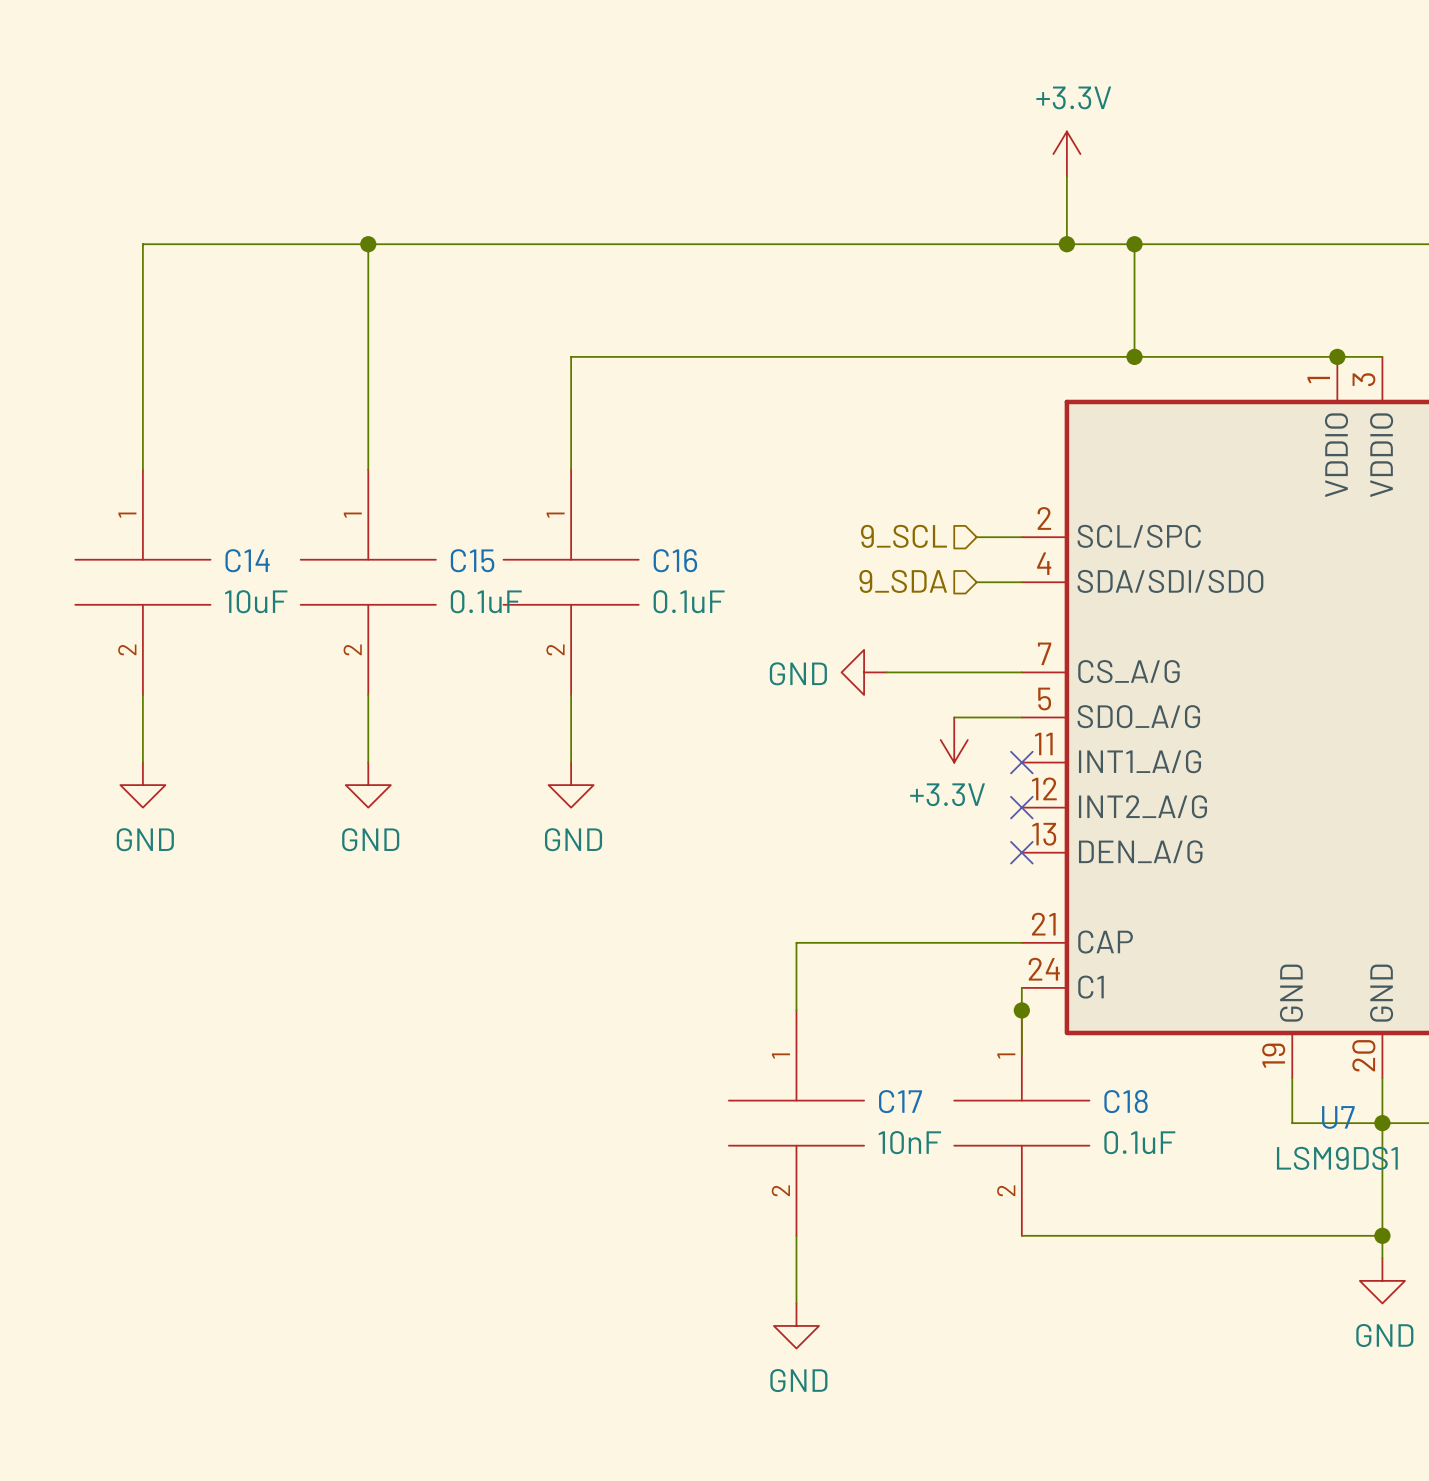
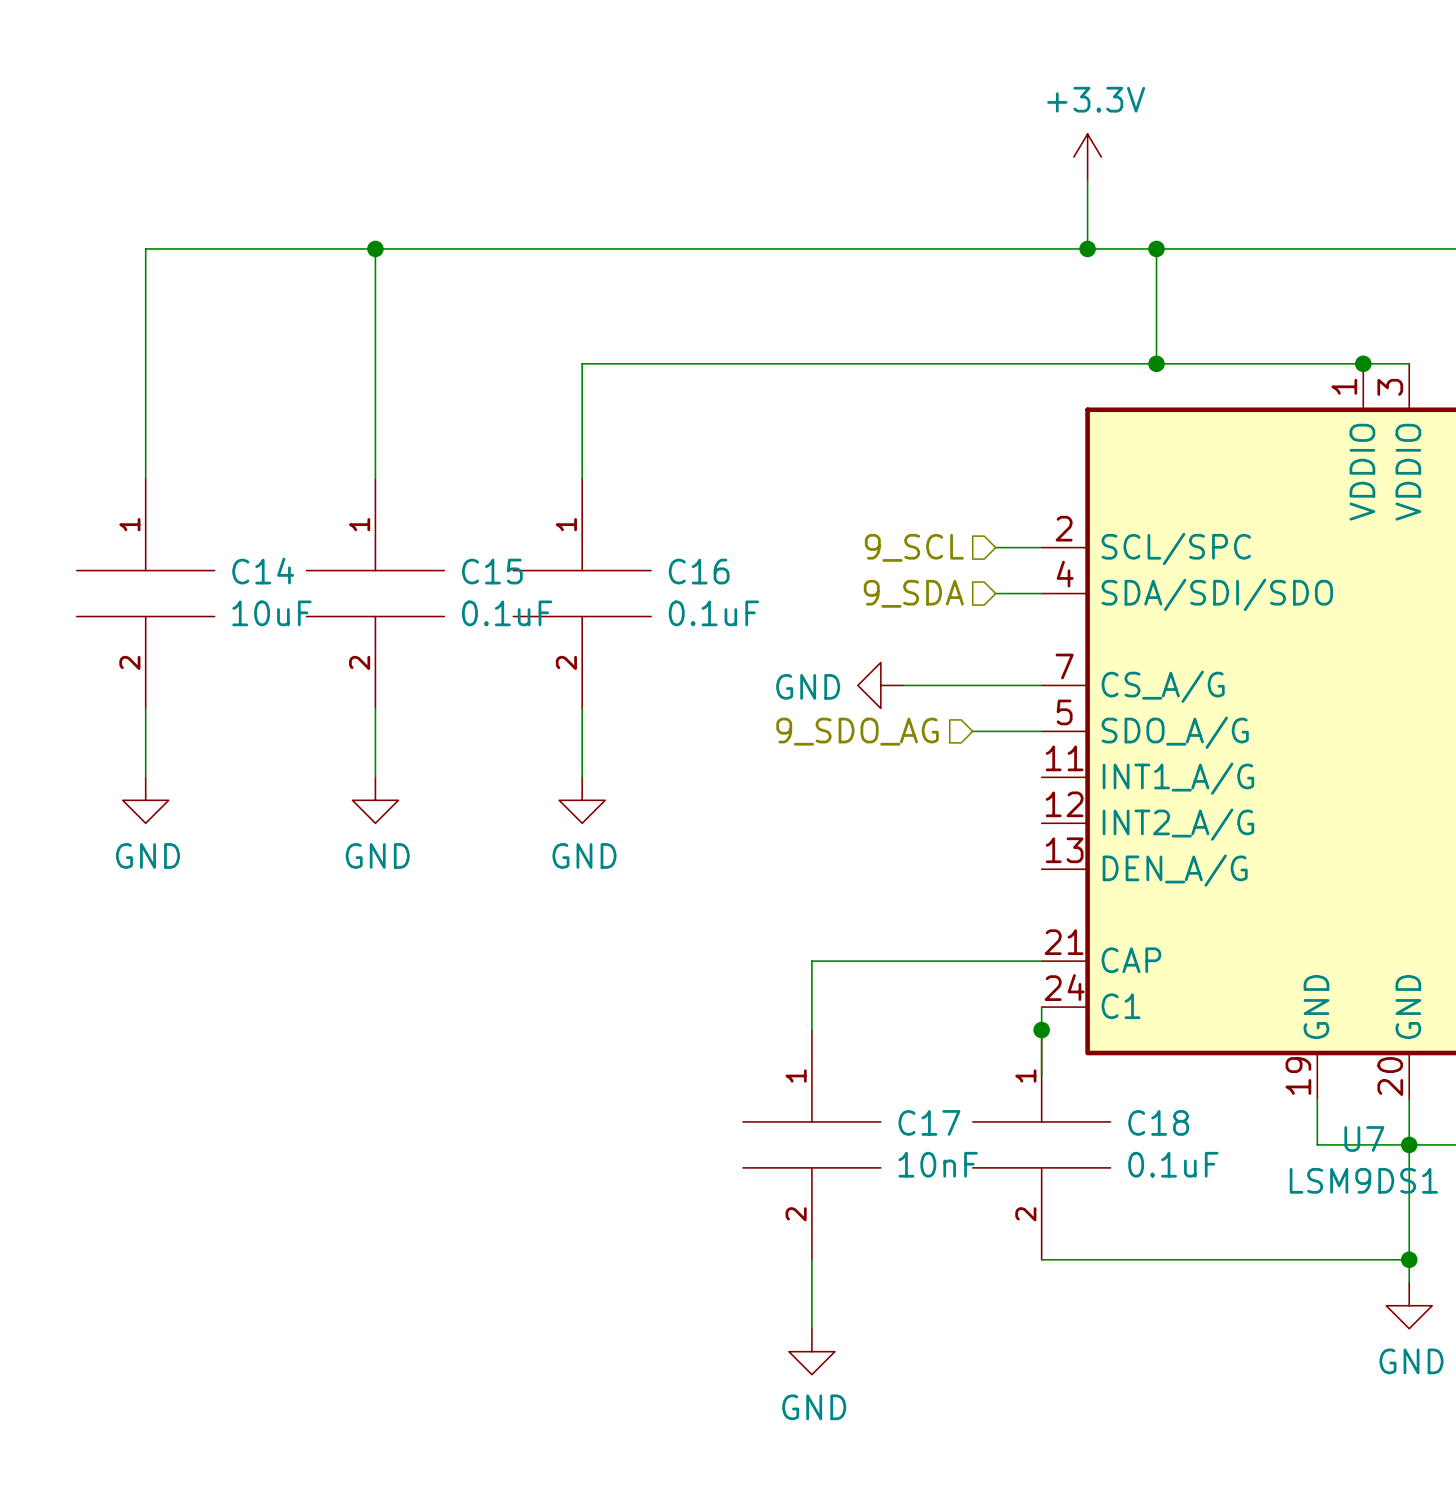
hierarchical label: none -> 9_SDO_AG (857, 731)
power symbol: +3.3V (954, 740) -> none
no-connect mark: (1021, 762) -> none
no-connect mark: (1021, 807) -> none
no-connect mark: (1021, 852) -> none

